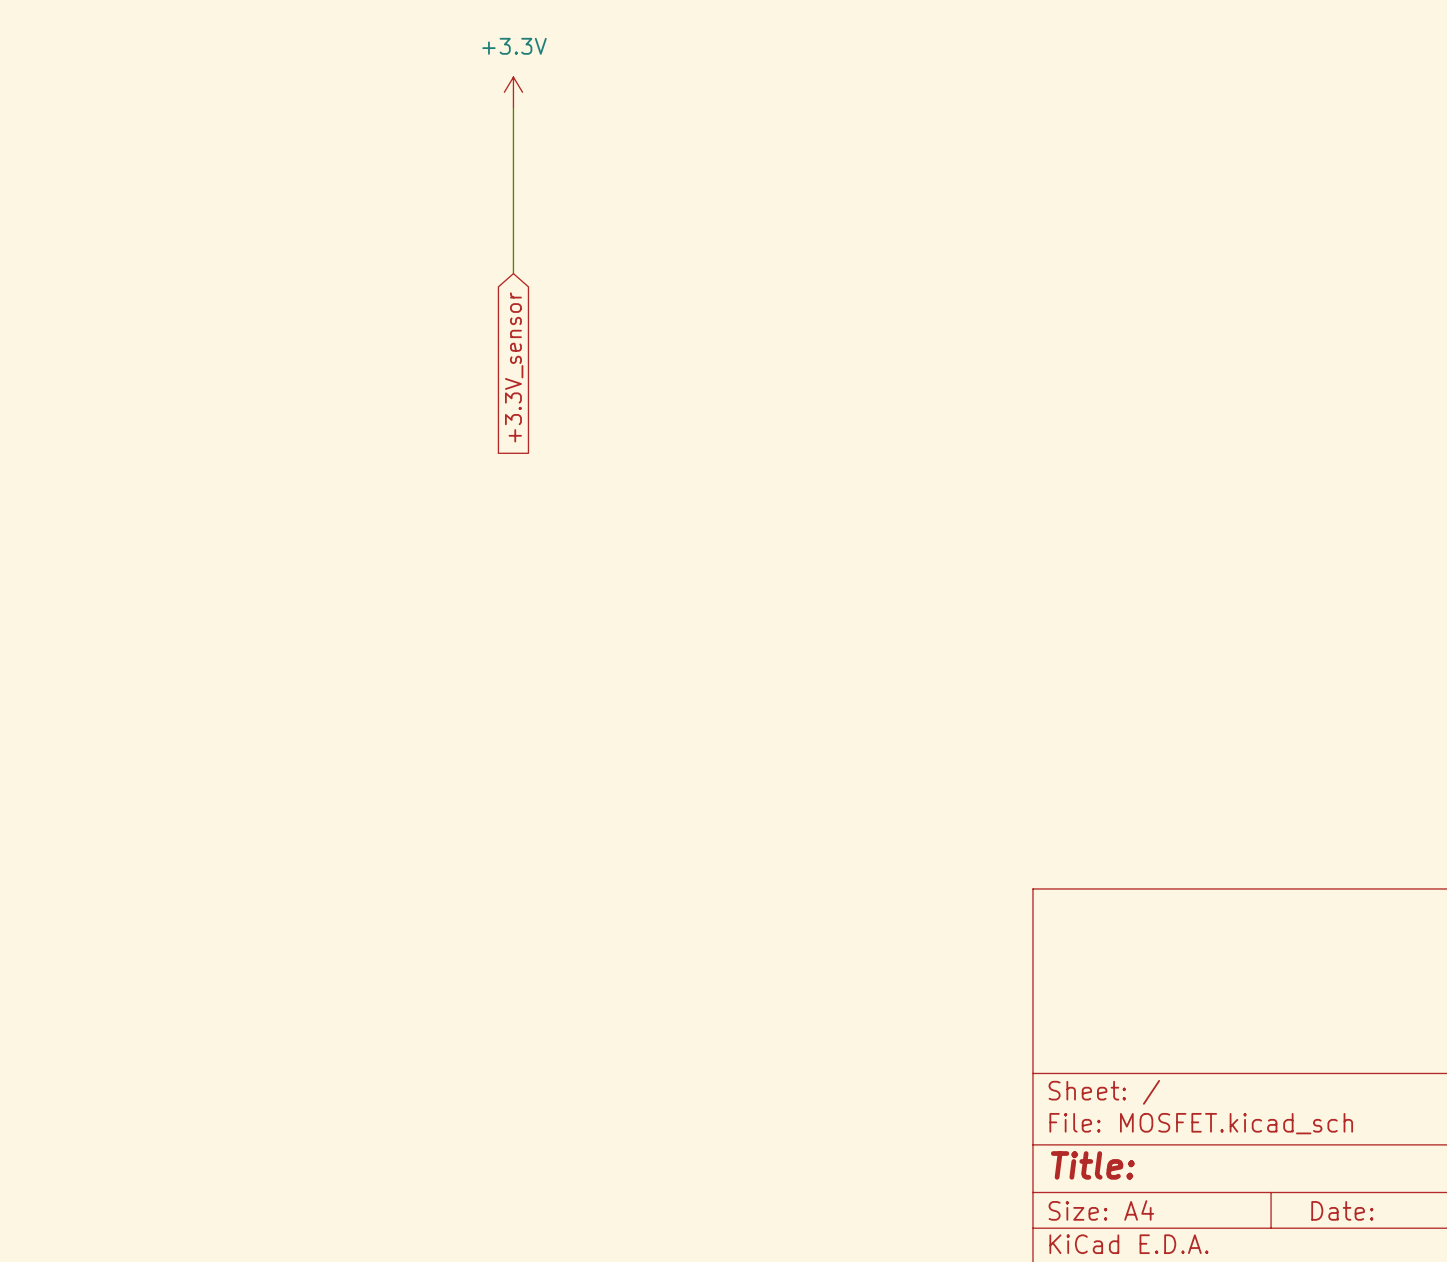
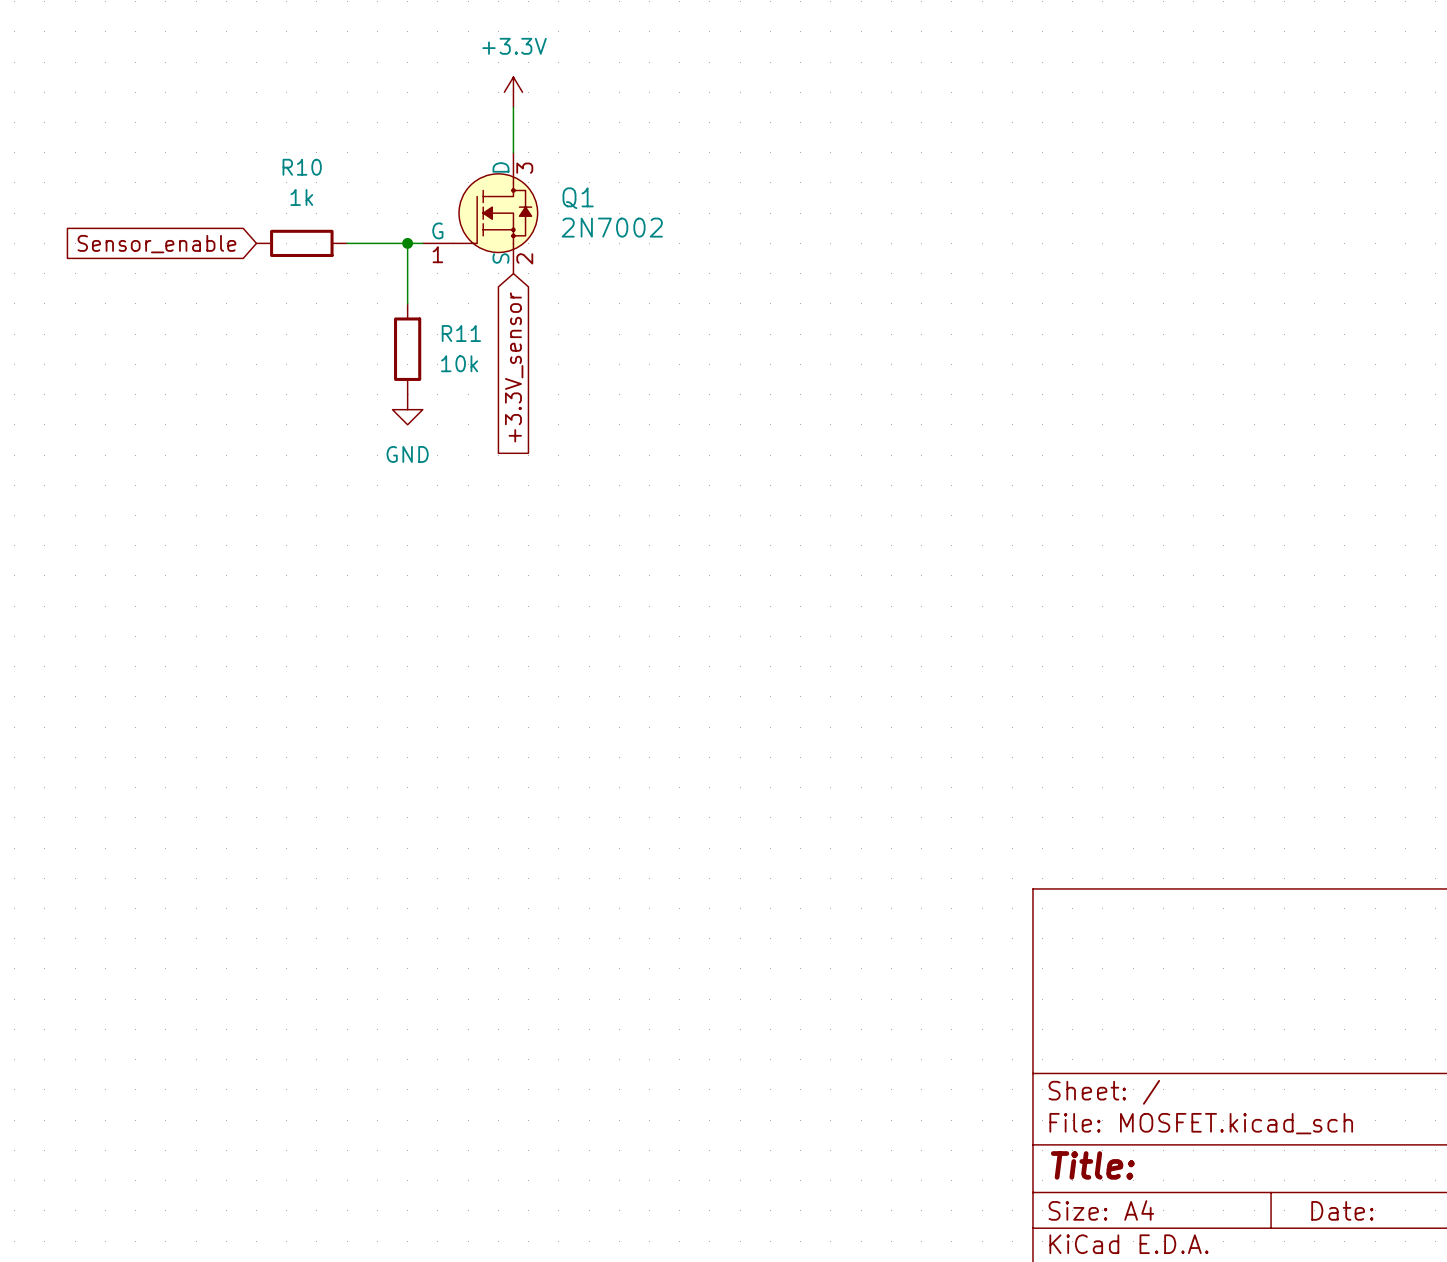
Q1: none -> 2N7002 (480, 213)
R10: none -> 1k (301, 243)
wire: none -> (347, 243) (422, 243)
wire: none -> (407, 243) (407, 303)
junction: none -> (407, 243)
global label: none -> Sensor_enable (156, 244)
R11: none -> 10k (407, 349)
power symbol: none -> GND (407, 409)

